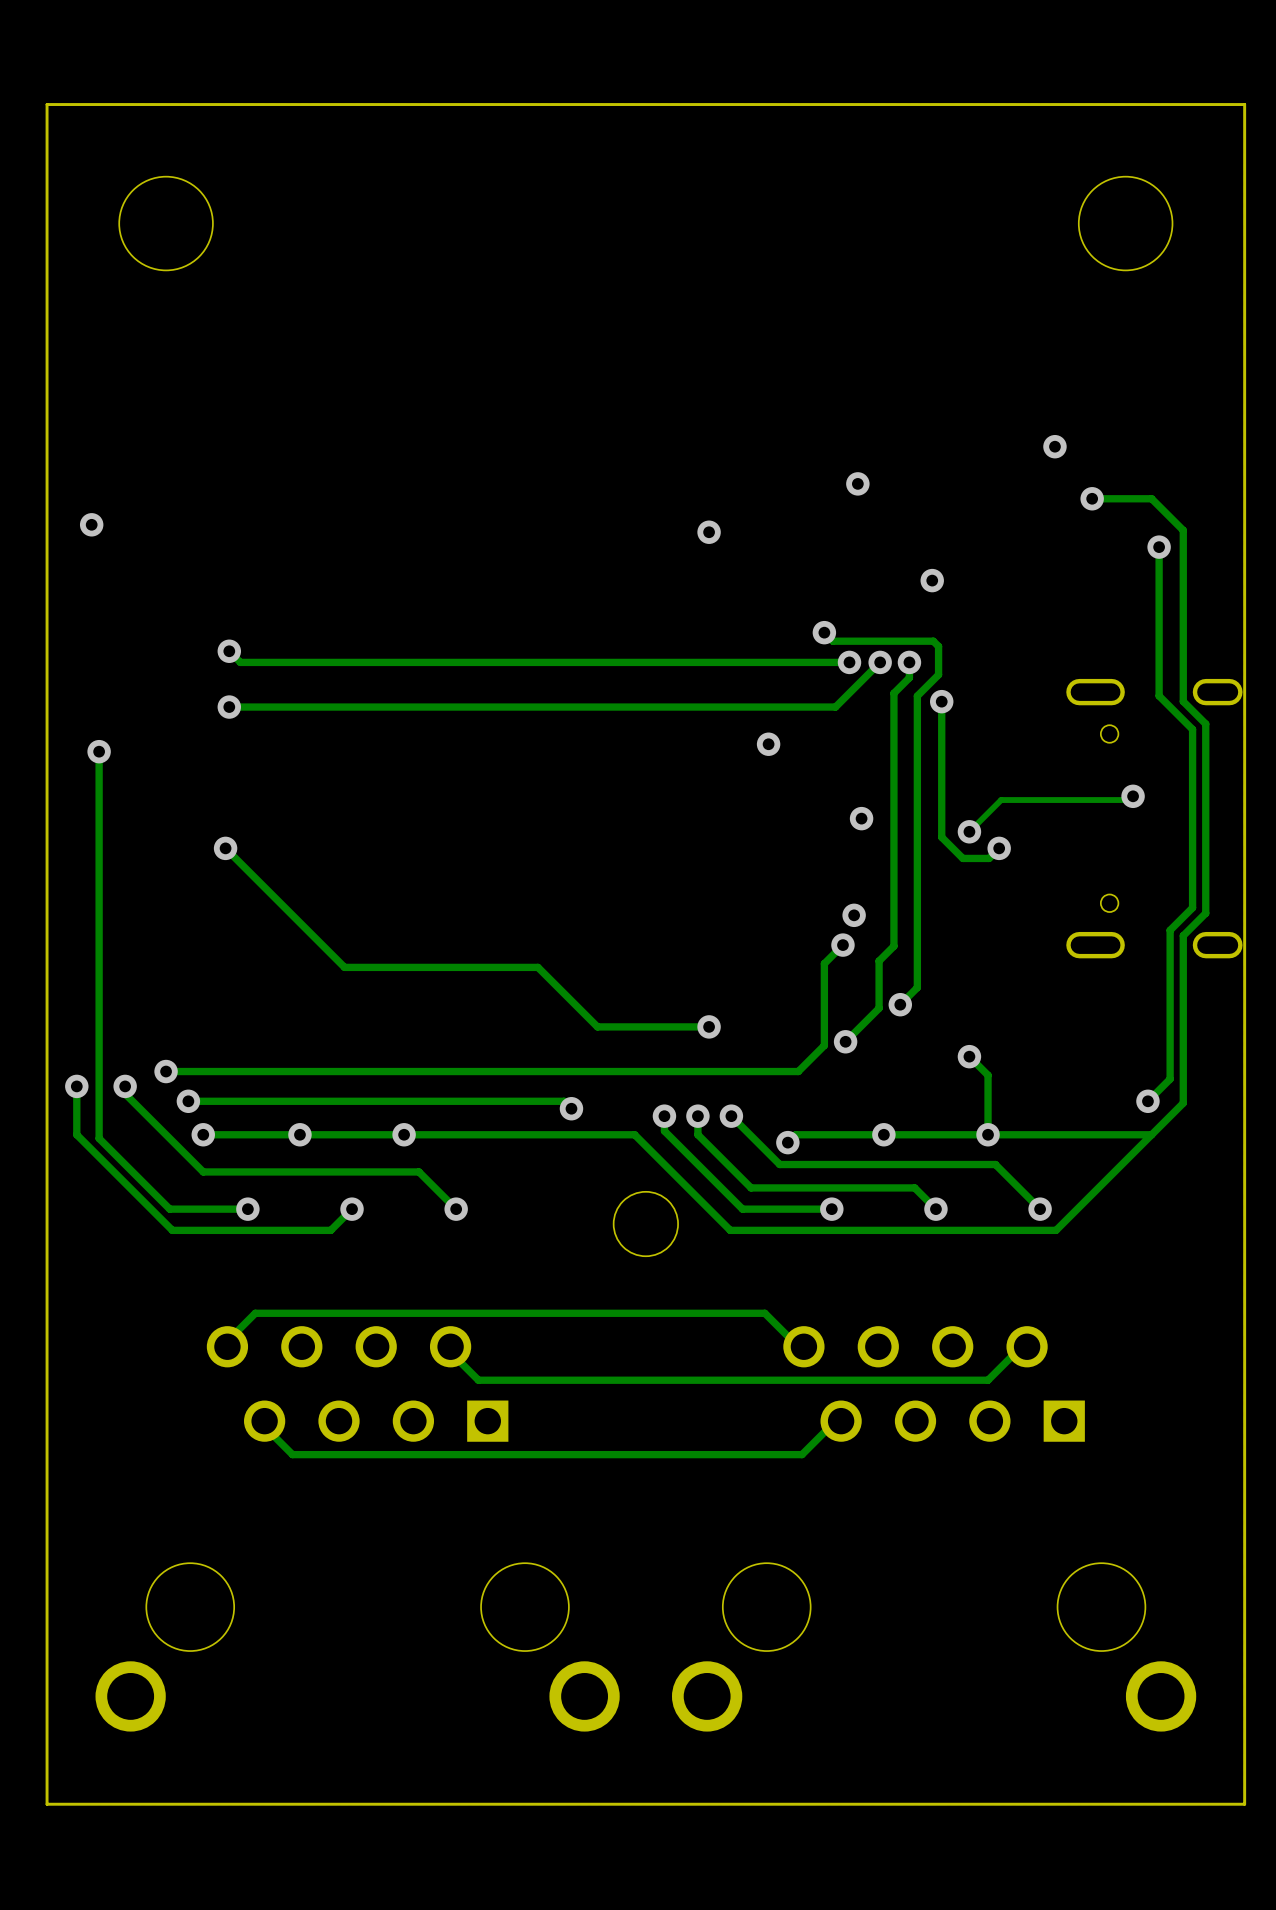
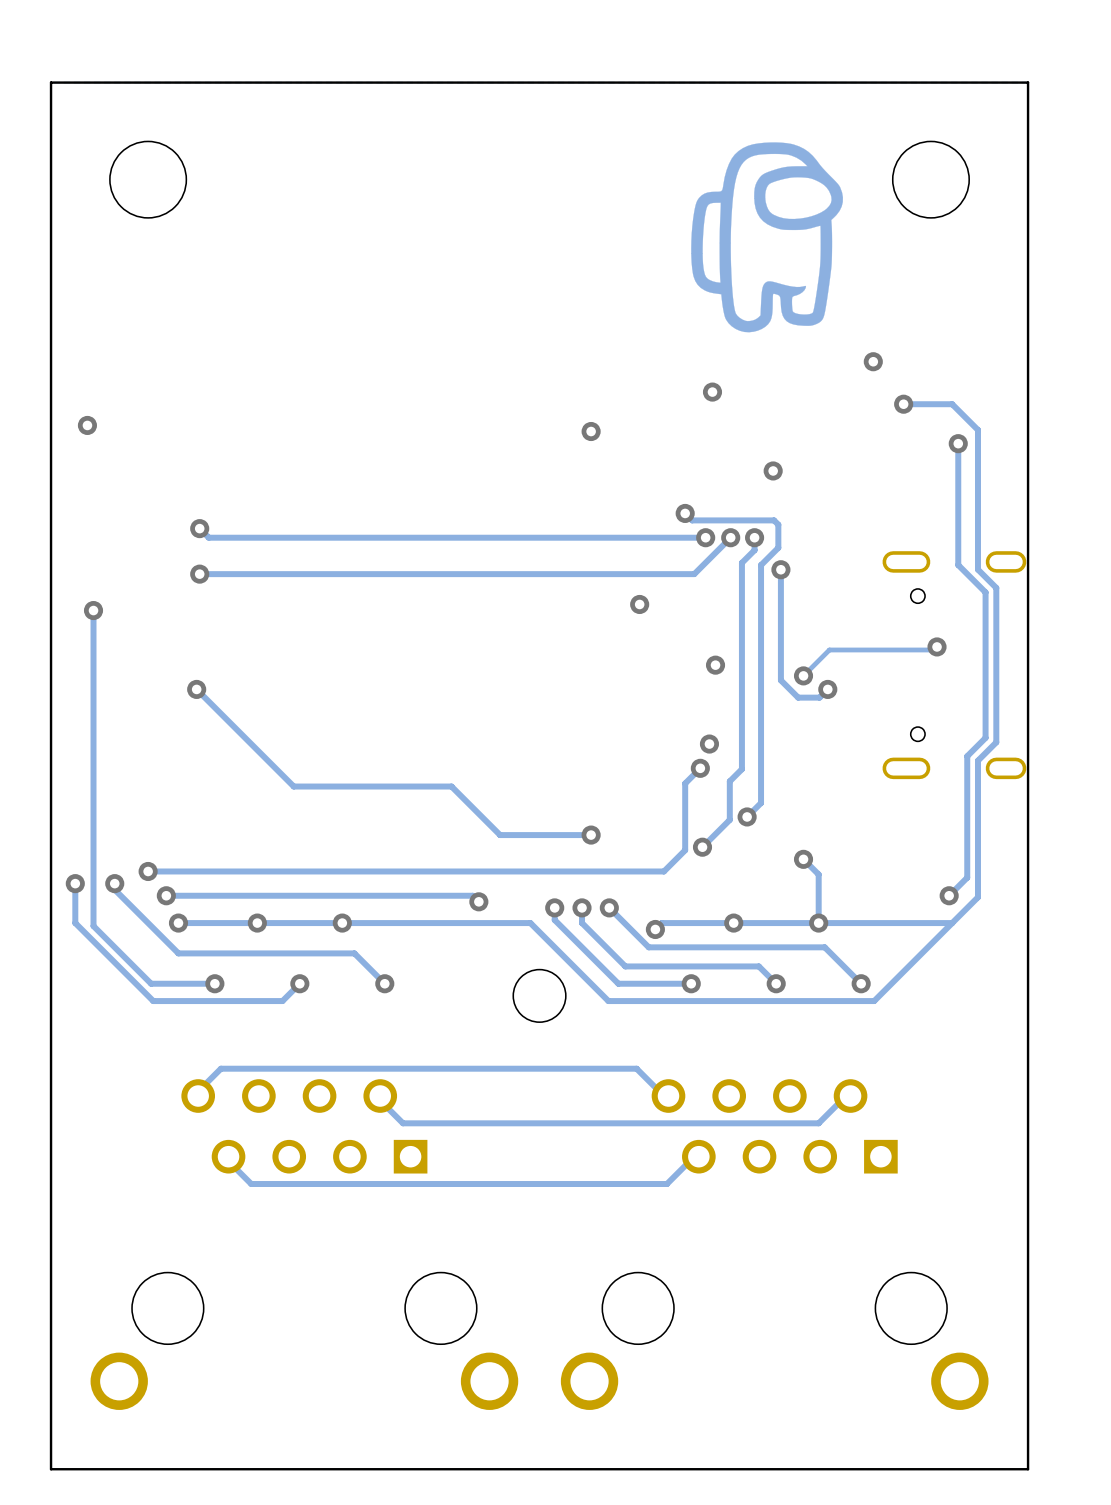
drawing: none -> [691, 142, 843, 333]

